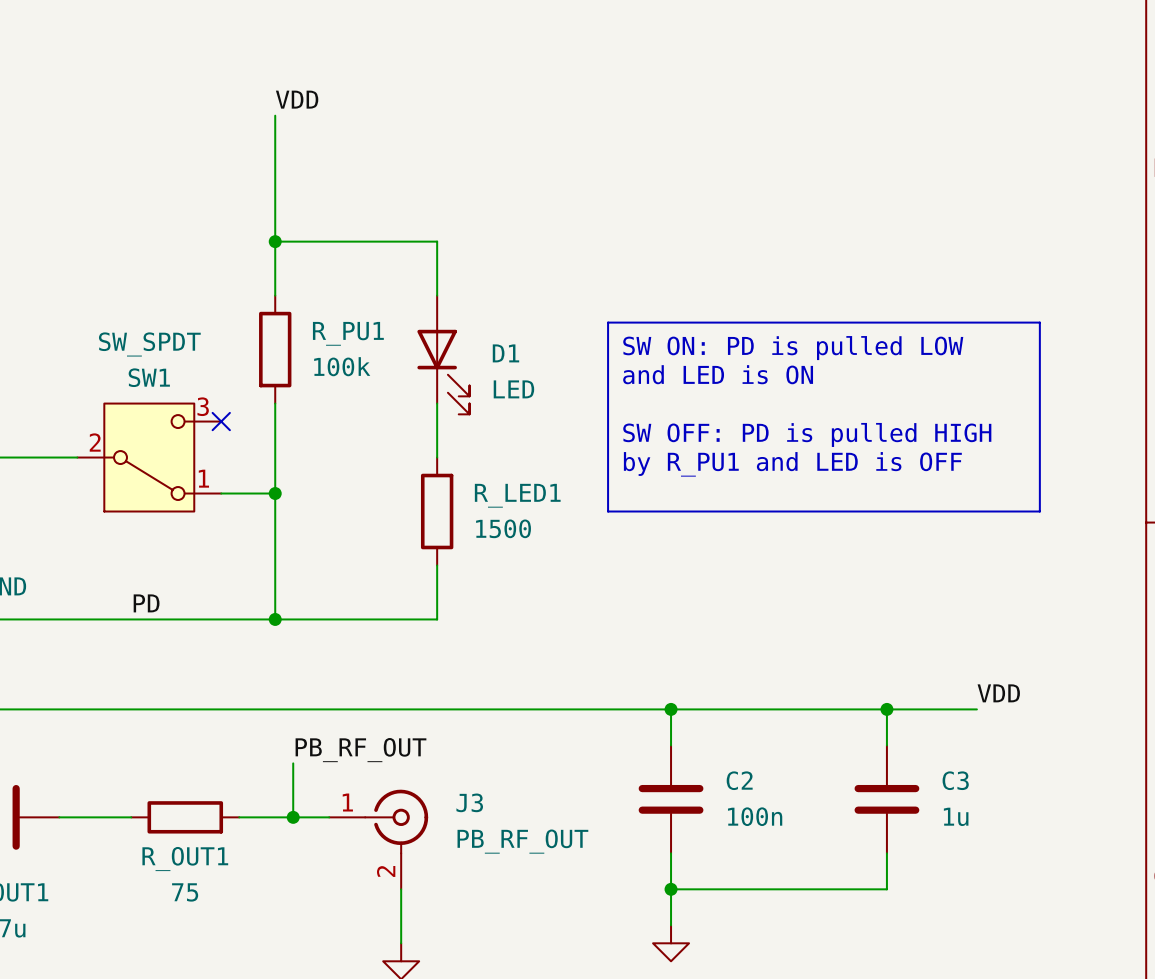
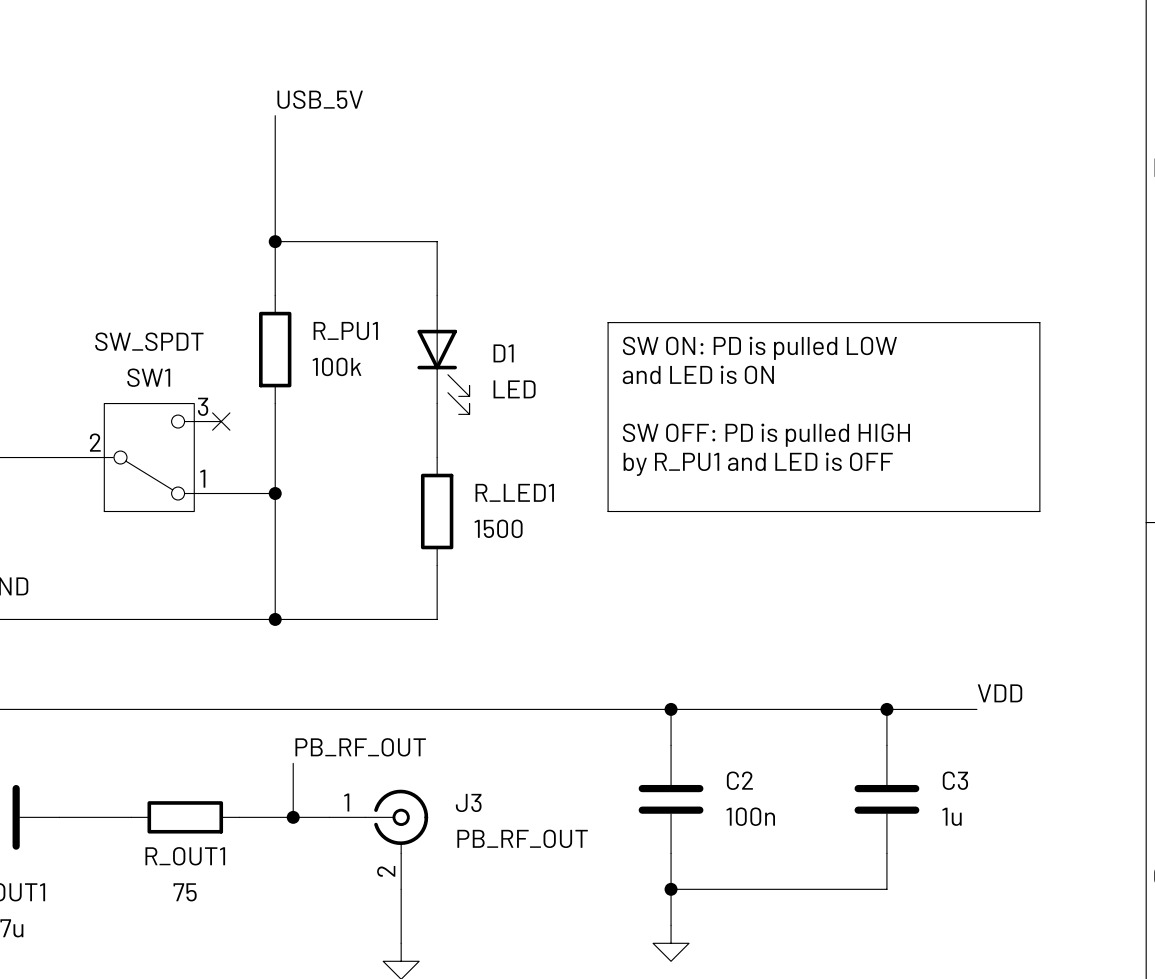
label: VDD (297, 99) -> USB_5V (320, 99)
label: PD (146, 603) -> none

